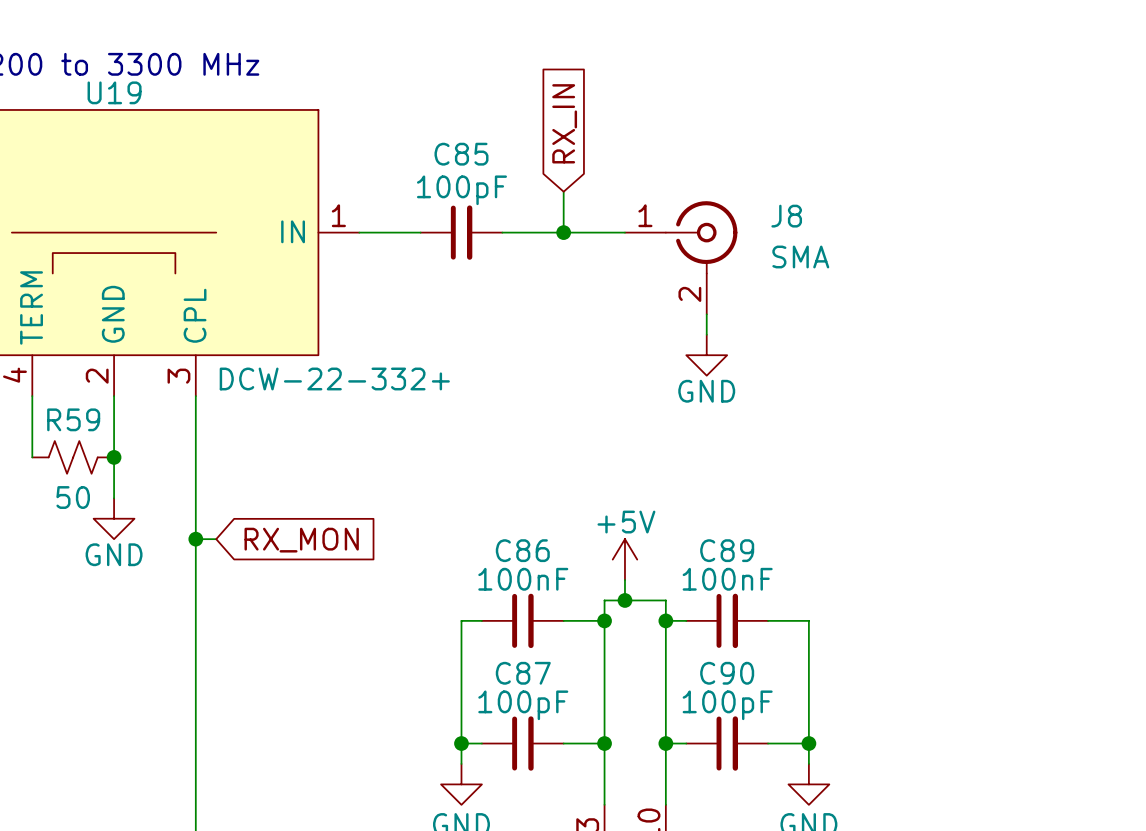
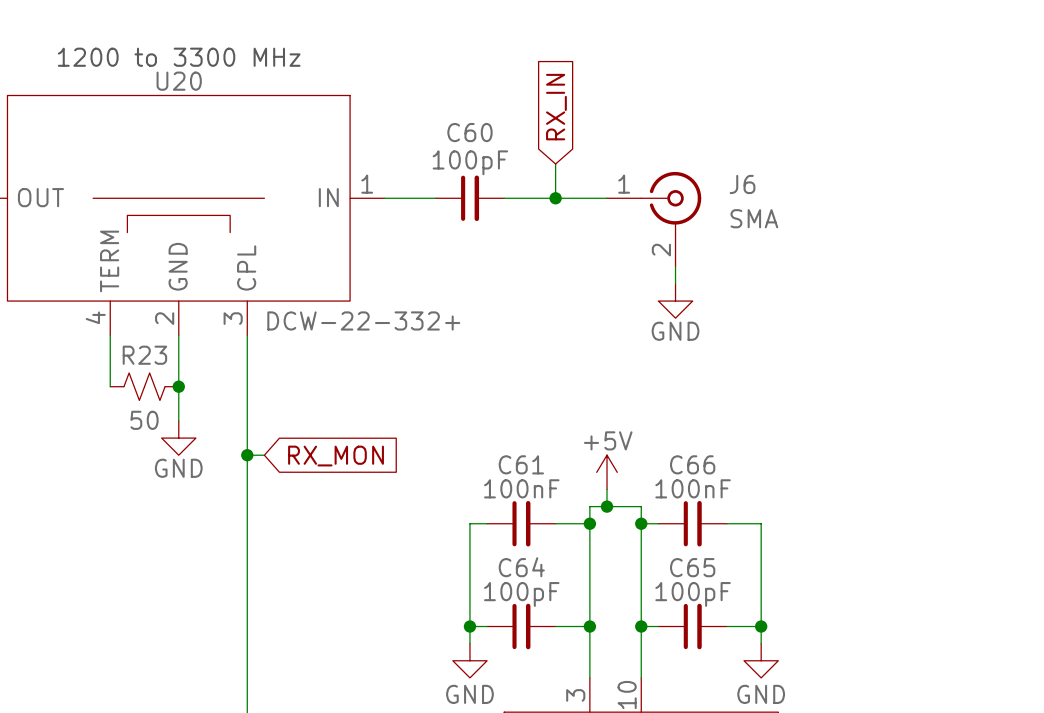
U19 name: U19 (114, 92) -> U20 (179, 81)
C85 name: C85 (461, 154) -> C60 (469, 132)
J8 name: J8 (786, 216) -> J6 (742, 184)
R59 name: R59 (73, 419) -> R23 (144, 355)
C86 name: C86 (522, 550) -> C61 (521, 464)
C89 name: C89 (727, 550) -> C66 (692, 464)
C87 name: C87 (523, 673) -> C64 (521, 567)
C90 name: C90 (727, 673) -> C65 (692, 567)

